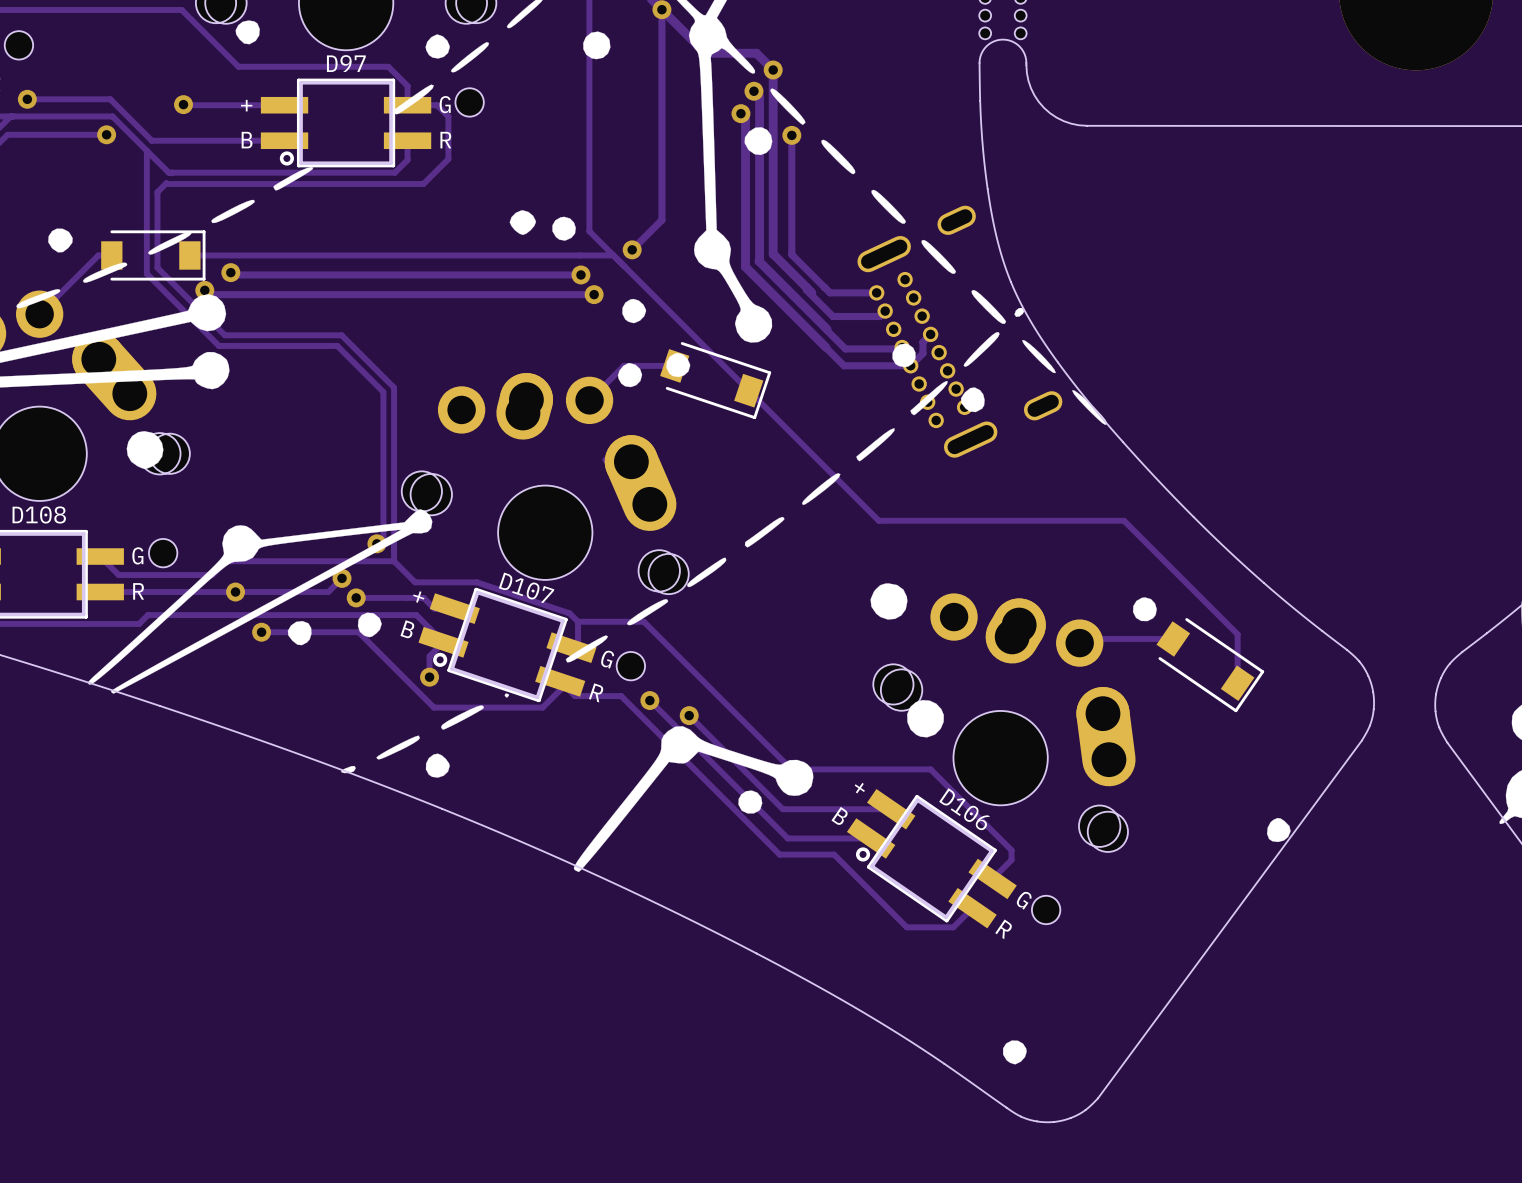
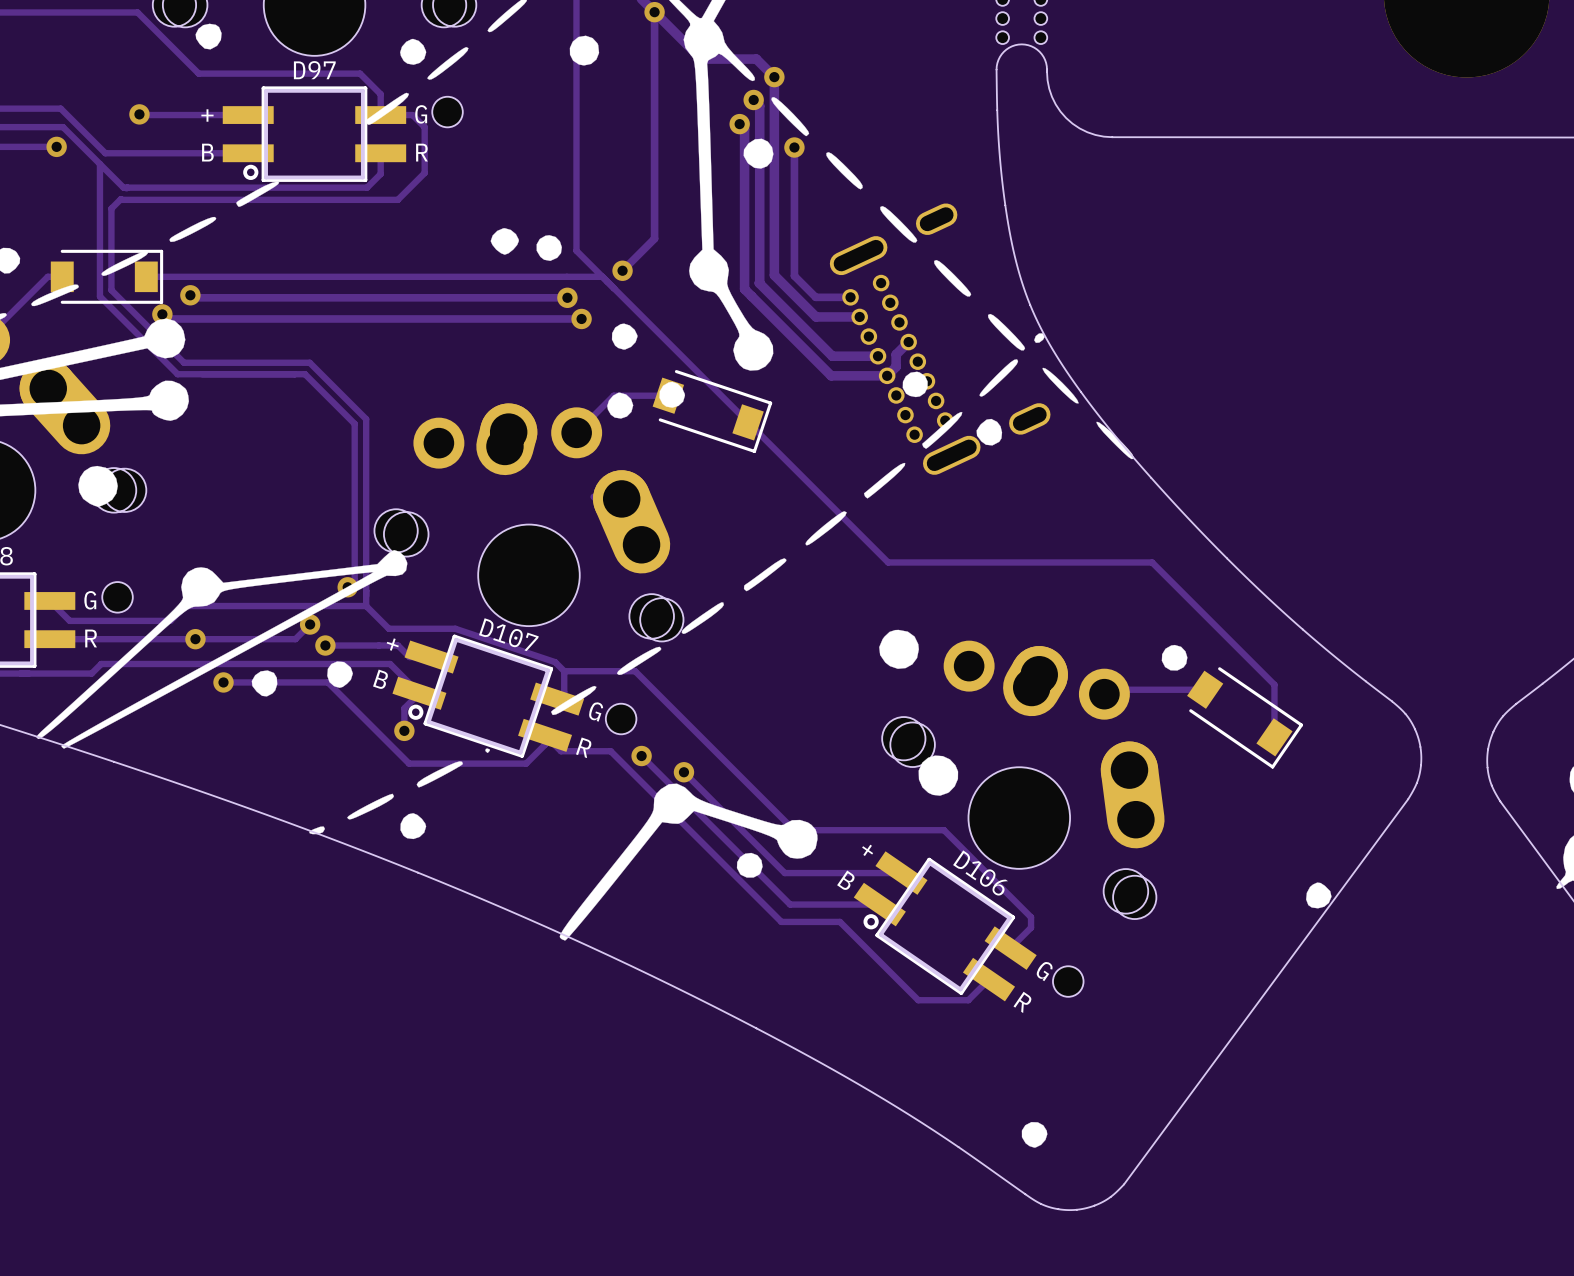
track: (811, 274) (830, 292) (876, 292) -> (815, 297) (850, 297)
track: (806, 287) (806, 290) (832, 316) (879, 316) (885, 311) -> none
track: none -> (859, 316) (816, 316)
track: (827, 329) (845, 348) (902, 347) -> (832, 356) (877, 356)
part position: (959, 331) -> (940, 339)
track: (930, 334) (922, 342) (922, 353) (910, 365) (844, 365) (825, 347) -> (908, 342) (896, 354) (896, 366) (887, 375) (831, 375)

